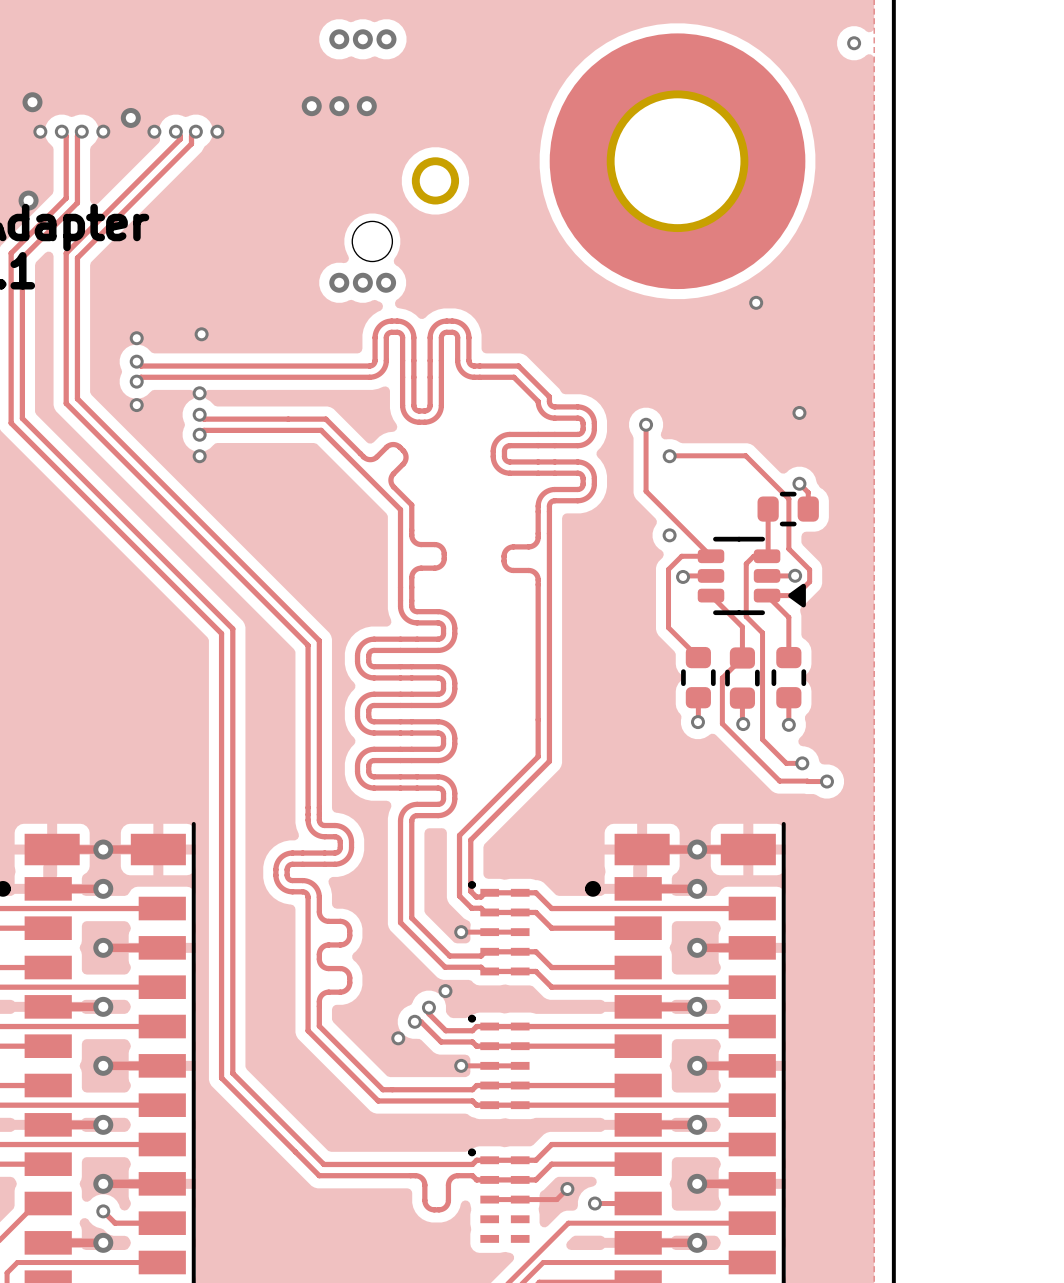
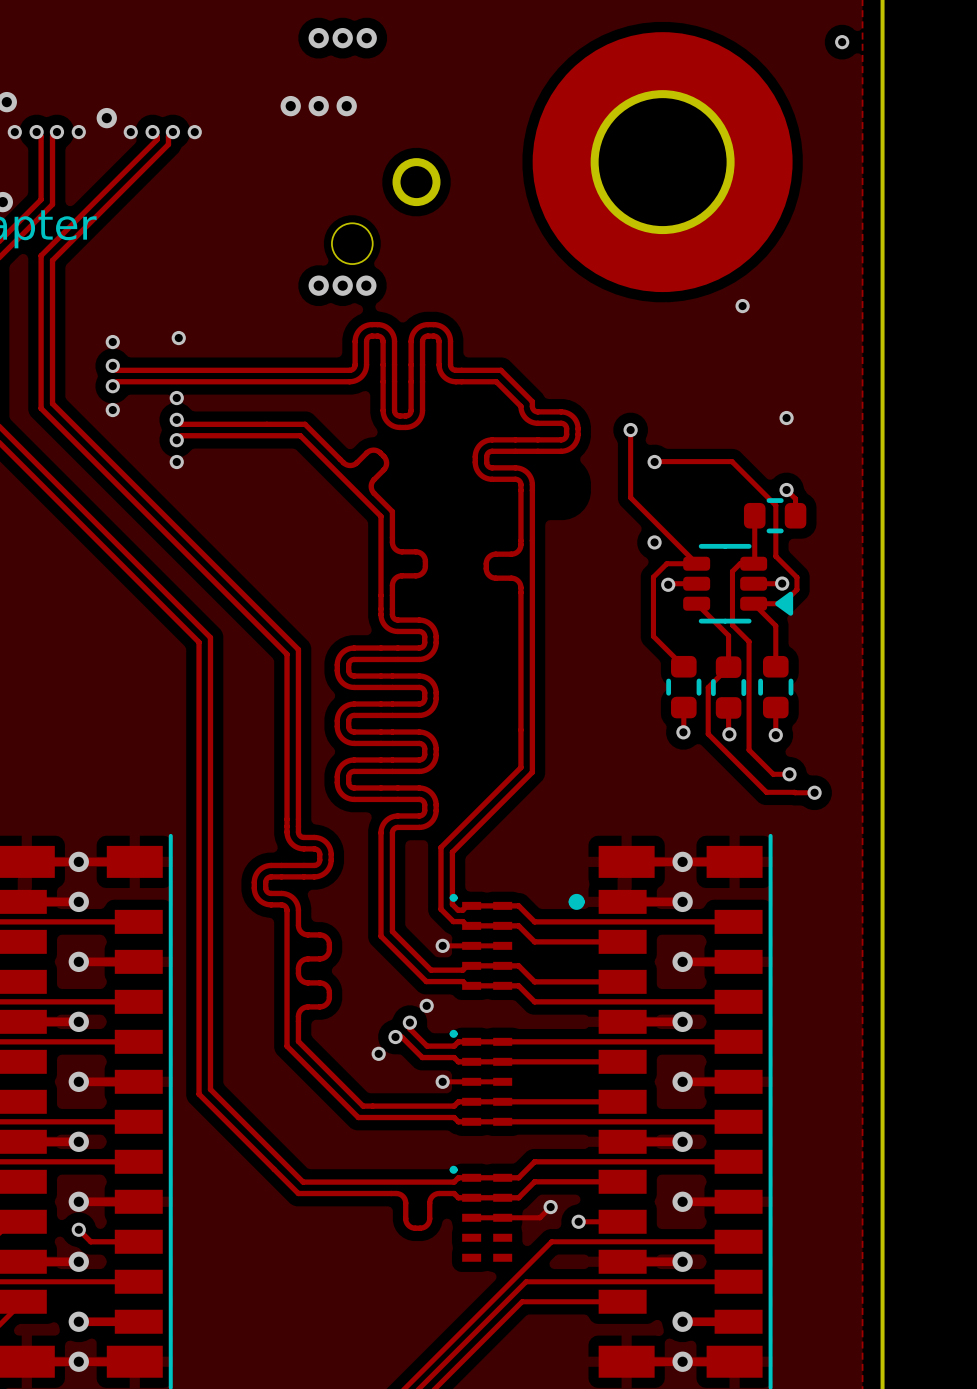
track: (532, 461) (581, 462) (589, 466) (593, 473) (593, 487) (588, 497) (579, 500) (553, 500) (549, 506) -> (515, 467) (526, 471) (531, 479) (532, 512)
track: (532, 473) (578, 473) (583, 477) (582, 485) (580, 488) (549, 490) (540, 497) (538, 506) -> (515, 479) (520, 484) (520, 512)

